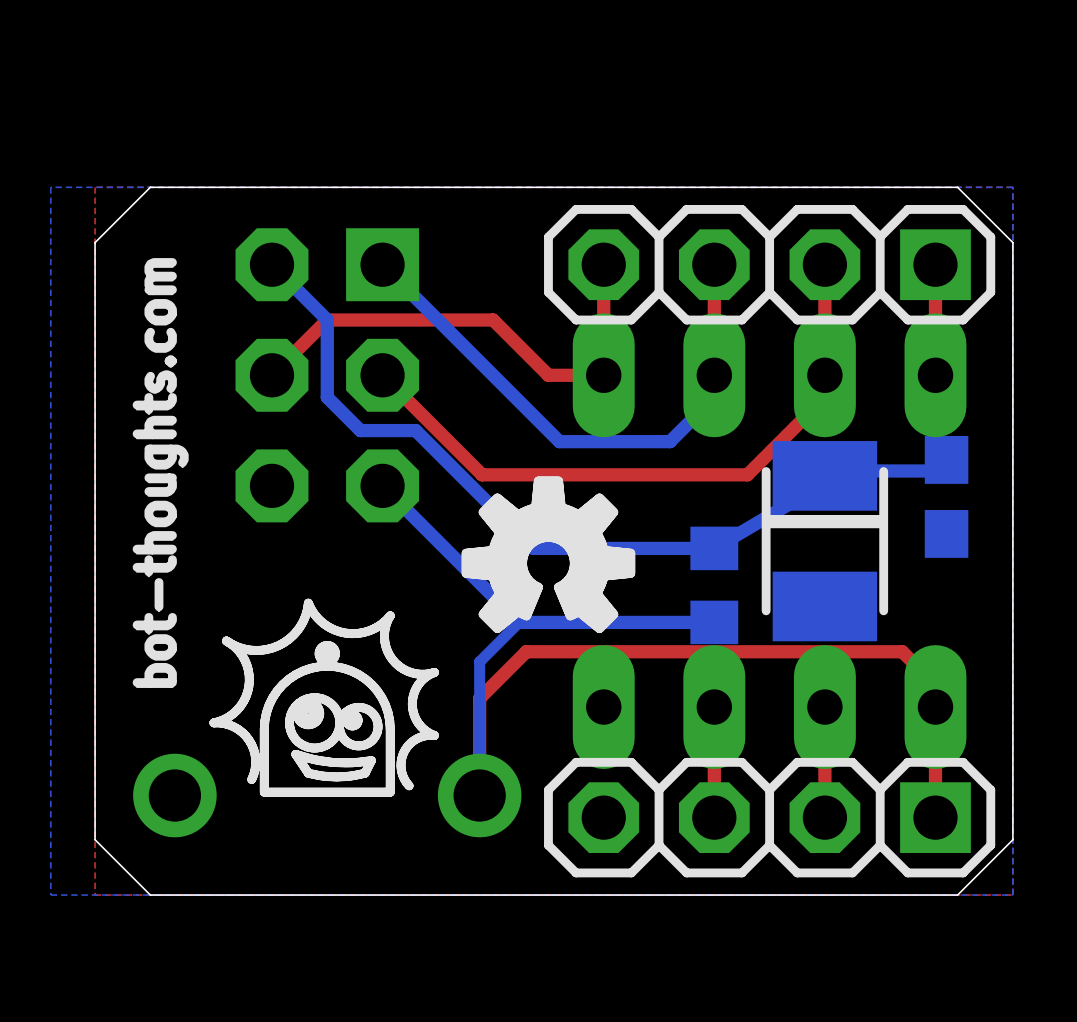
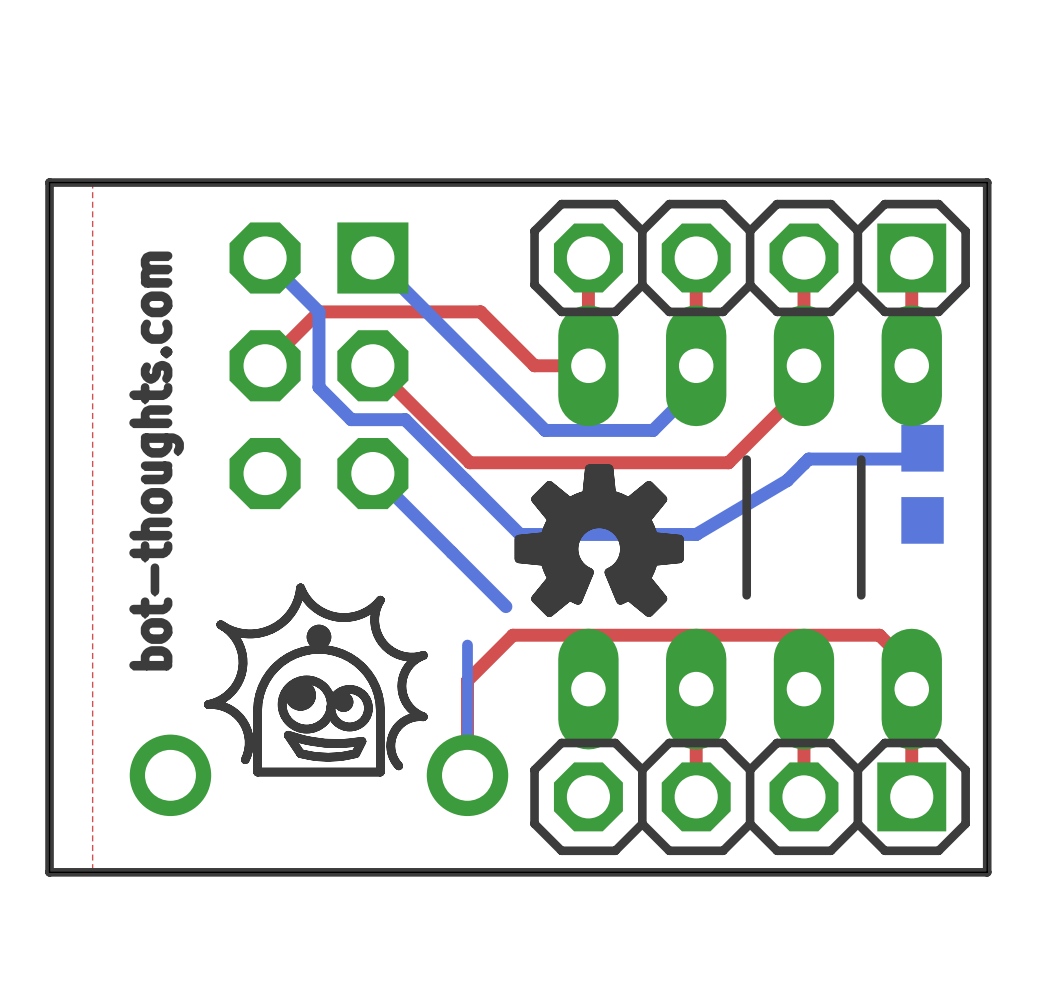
board edge: (150, 187) (95, 242) (95, 839) (150, 895) -> (146, 182) (49, 182) (49, 872) (146, 872)
board edge: (957, 187) (1012, 242) -> (933, 182) (987, 182) (987, 236)
line: none -> (987, 182) (49, 182) (49, 872) (987, 872) (987, 182)
part: (824, 541) -> none
drawing position: (548, 554) -> (599, 540)
part: (714, 585) -> none
bottom track: (714, 622) (519, 622) (479, 661) -> none
board edge: (1012, 839) (957, 895) -> (987, 818) (987, 872) (933, 872)

